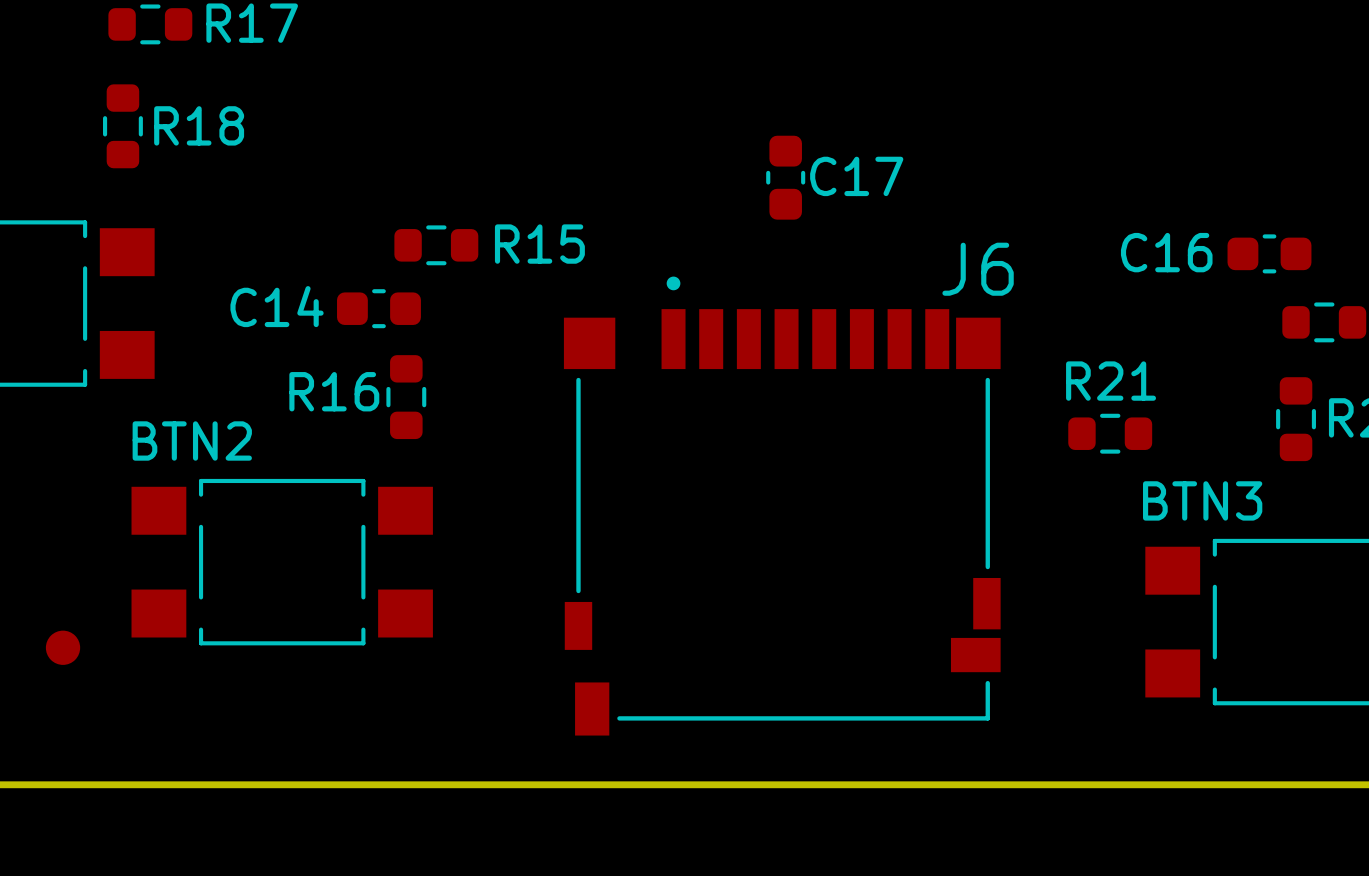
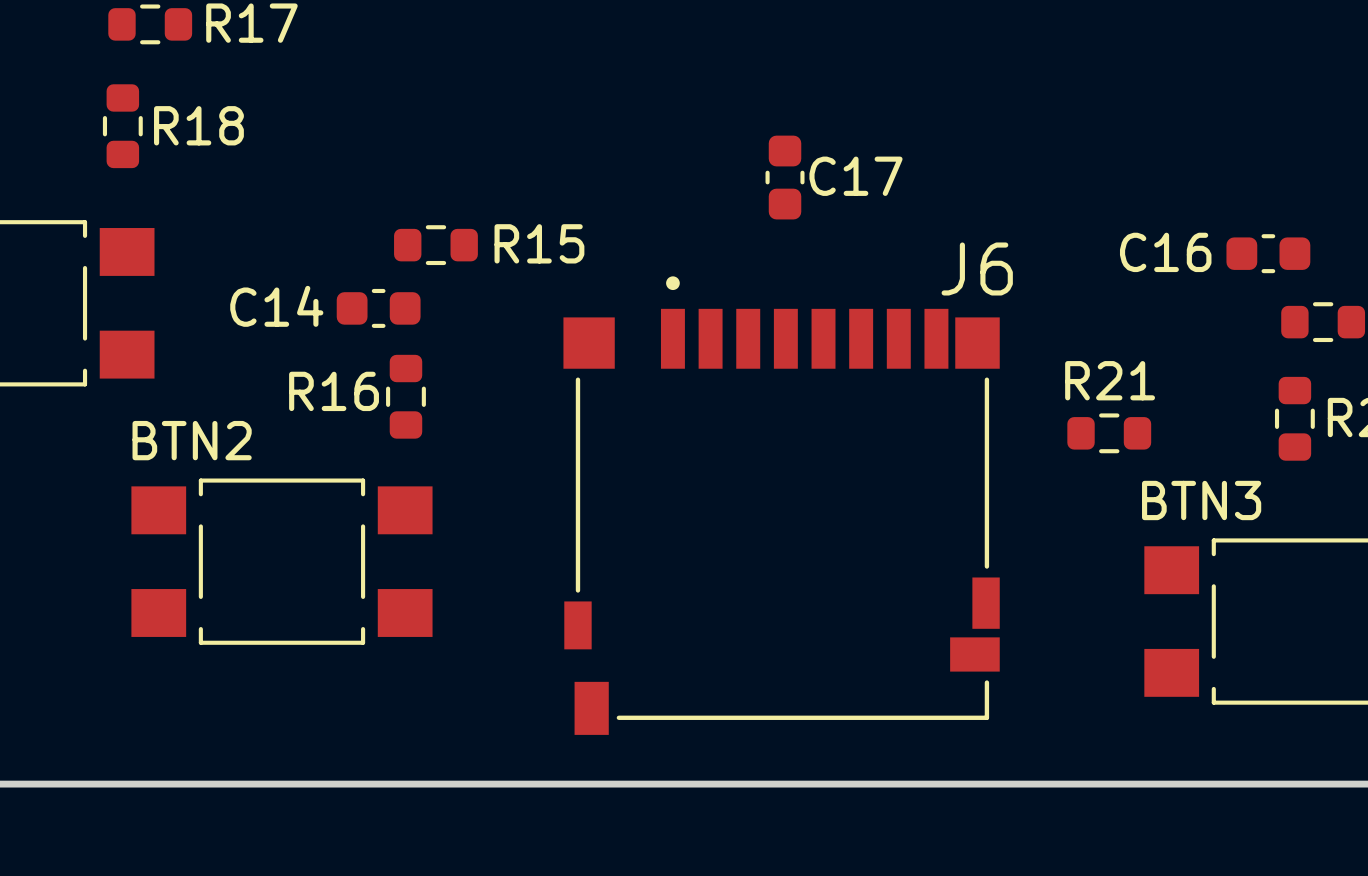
part: (63, 647) -> none

